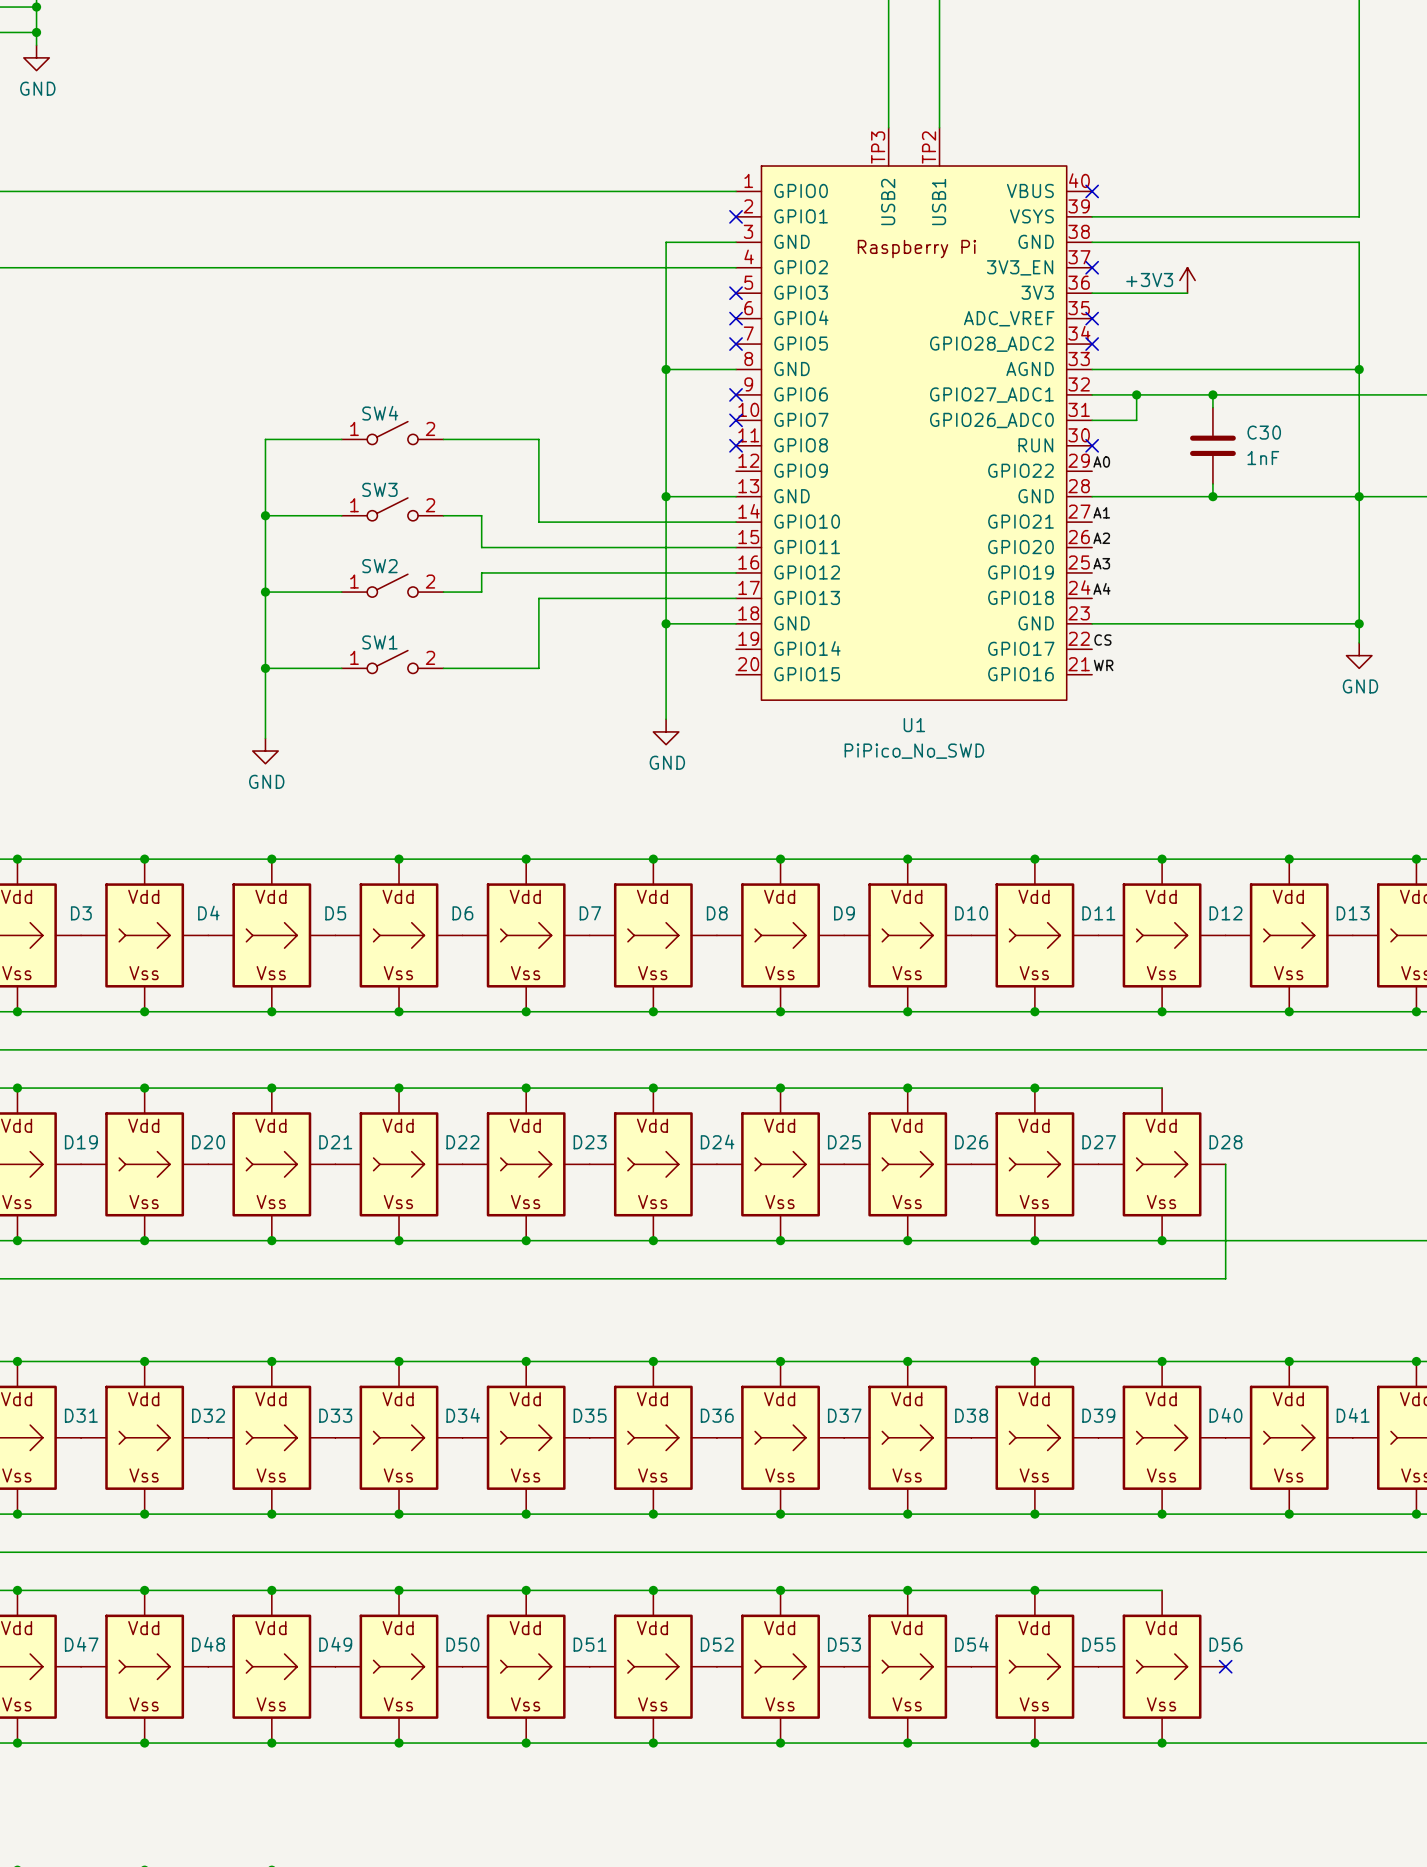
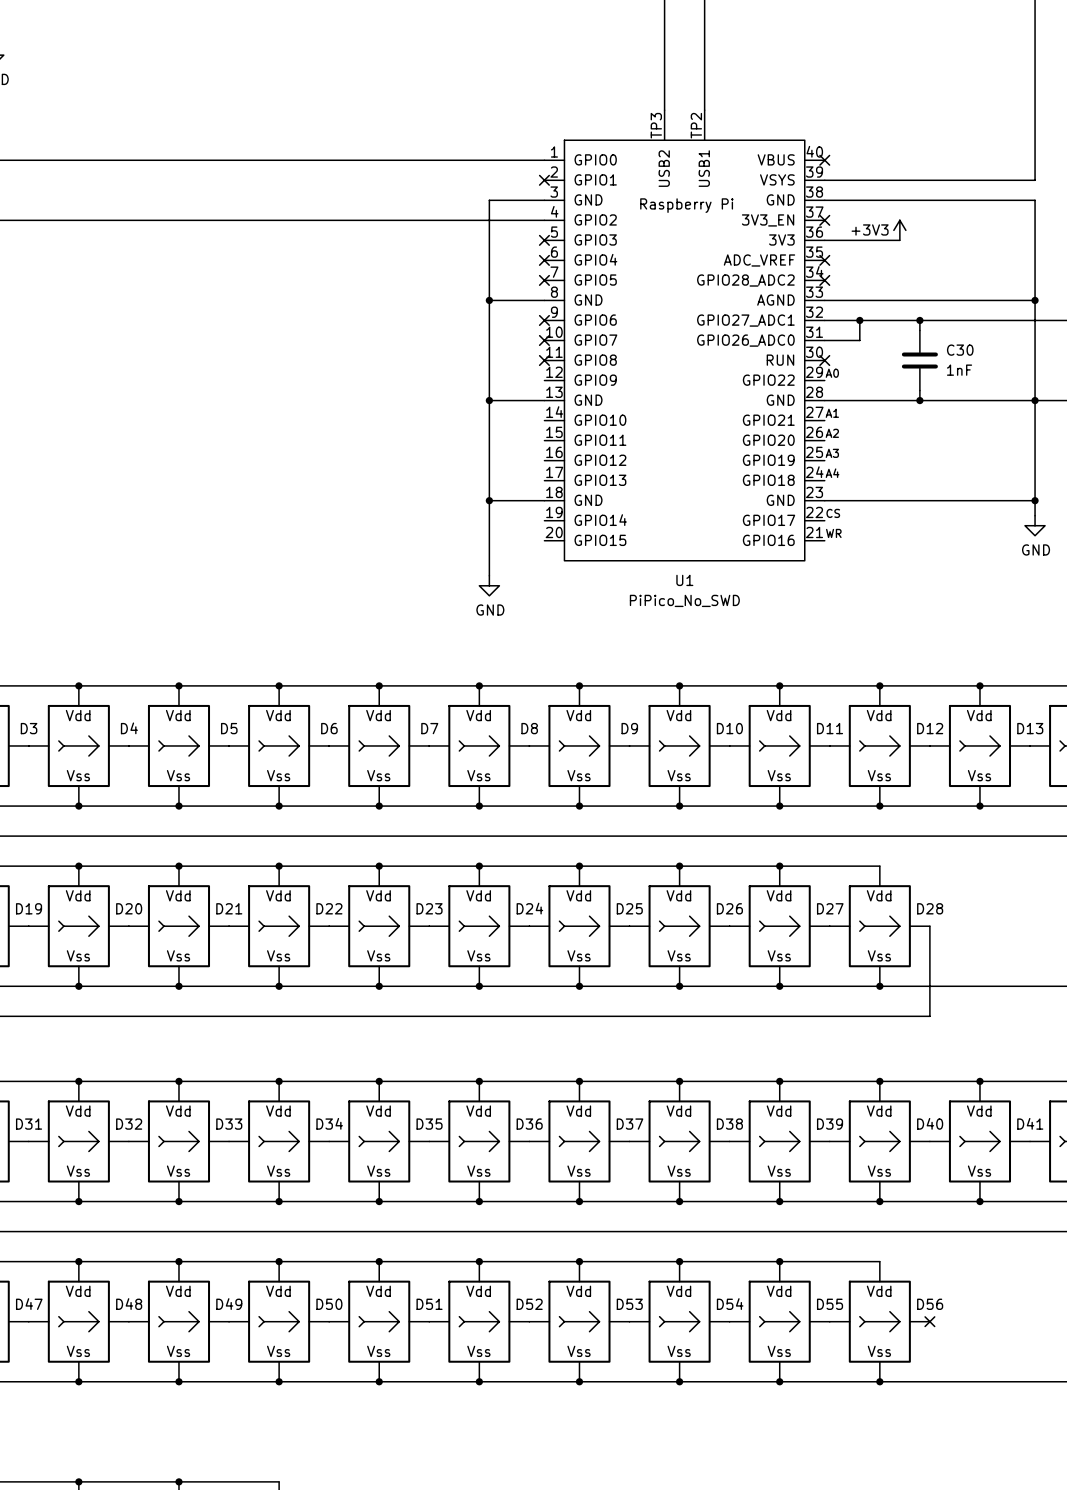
SW4: (392, 433) -> none
wire: (341, 439) (265, 439) (265, 738) -> none
wire: (443, 439) (538, 439) (538, 522) (736, 522) -> none
SW3: (392, 509) -> none
wire: (265, 515) (341, 515) -> none
junction: (265, 515) -> none
wire: (443, 515) (481, 515) (481, 547) (736, 547) -> none
wire: (736, 572) (481, 572) (481, 592) (443, 592) -> none
SW2: (392, 585) -> none
wire: (265, 592) (341, 592) -> none
junction: (265, 592) -> none
wire: (736, 598) (538, 598) (538, 668) (443, 668) -> none
SW1: (392, 662) -> none
wire: (265, 668) (341, 668) -> none
junction: (265, 668) -> none
power symbol: GND (265, 751) -> none

